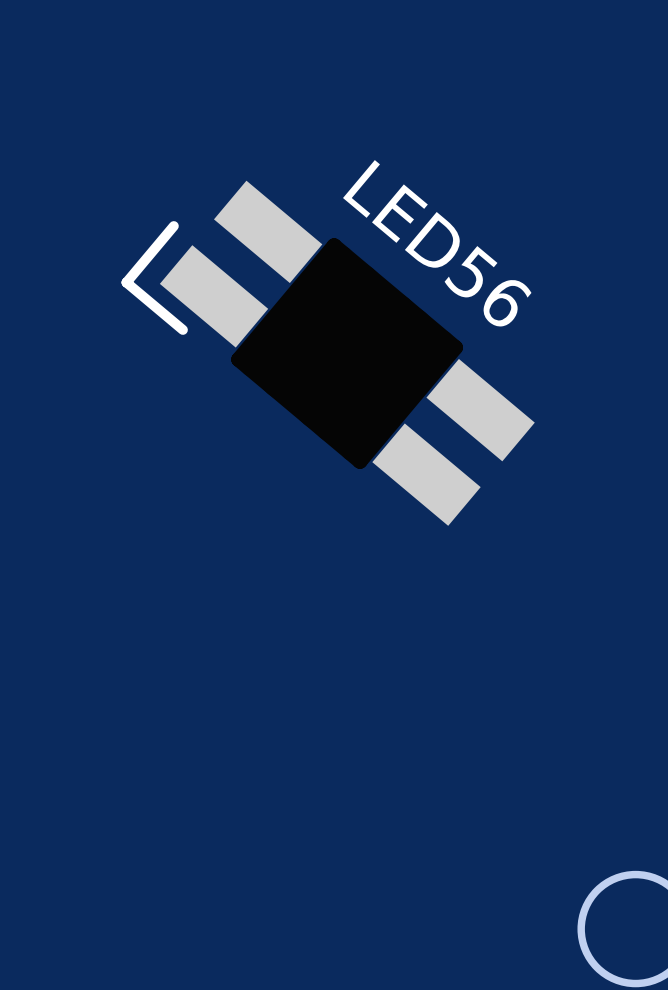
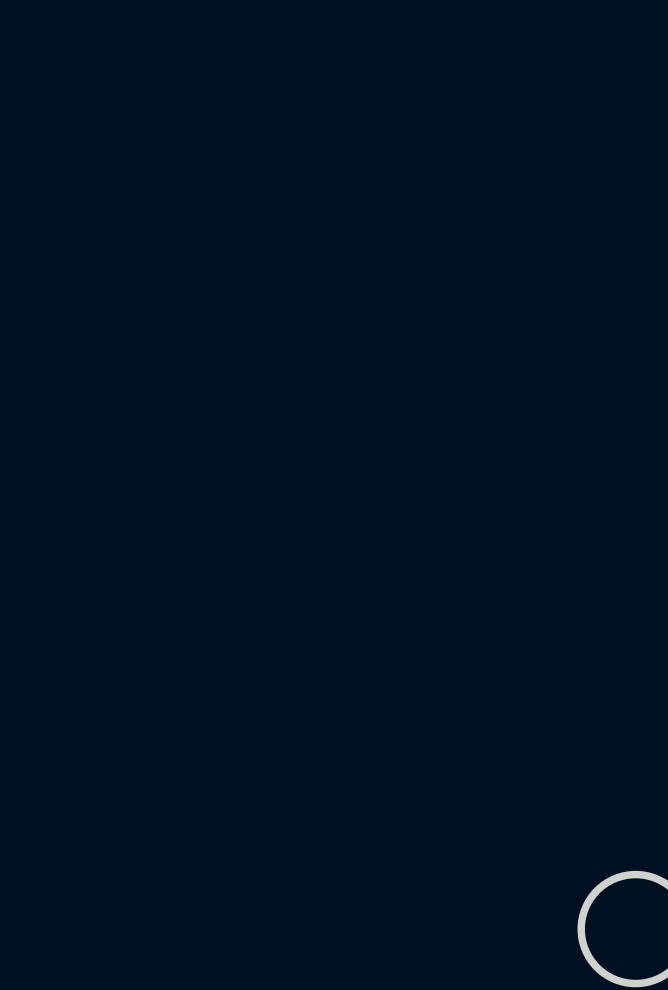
LED56: (328, 353) -> none

